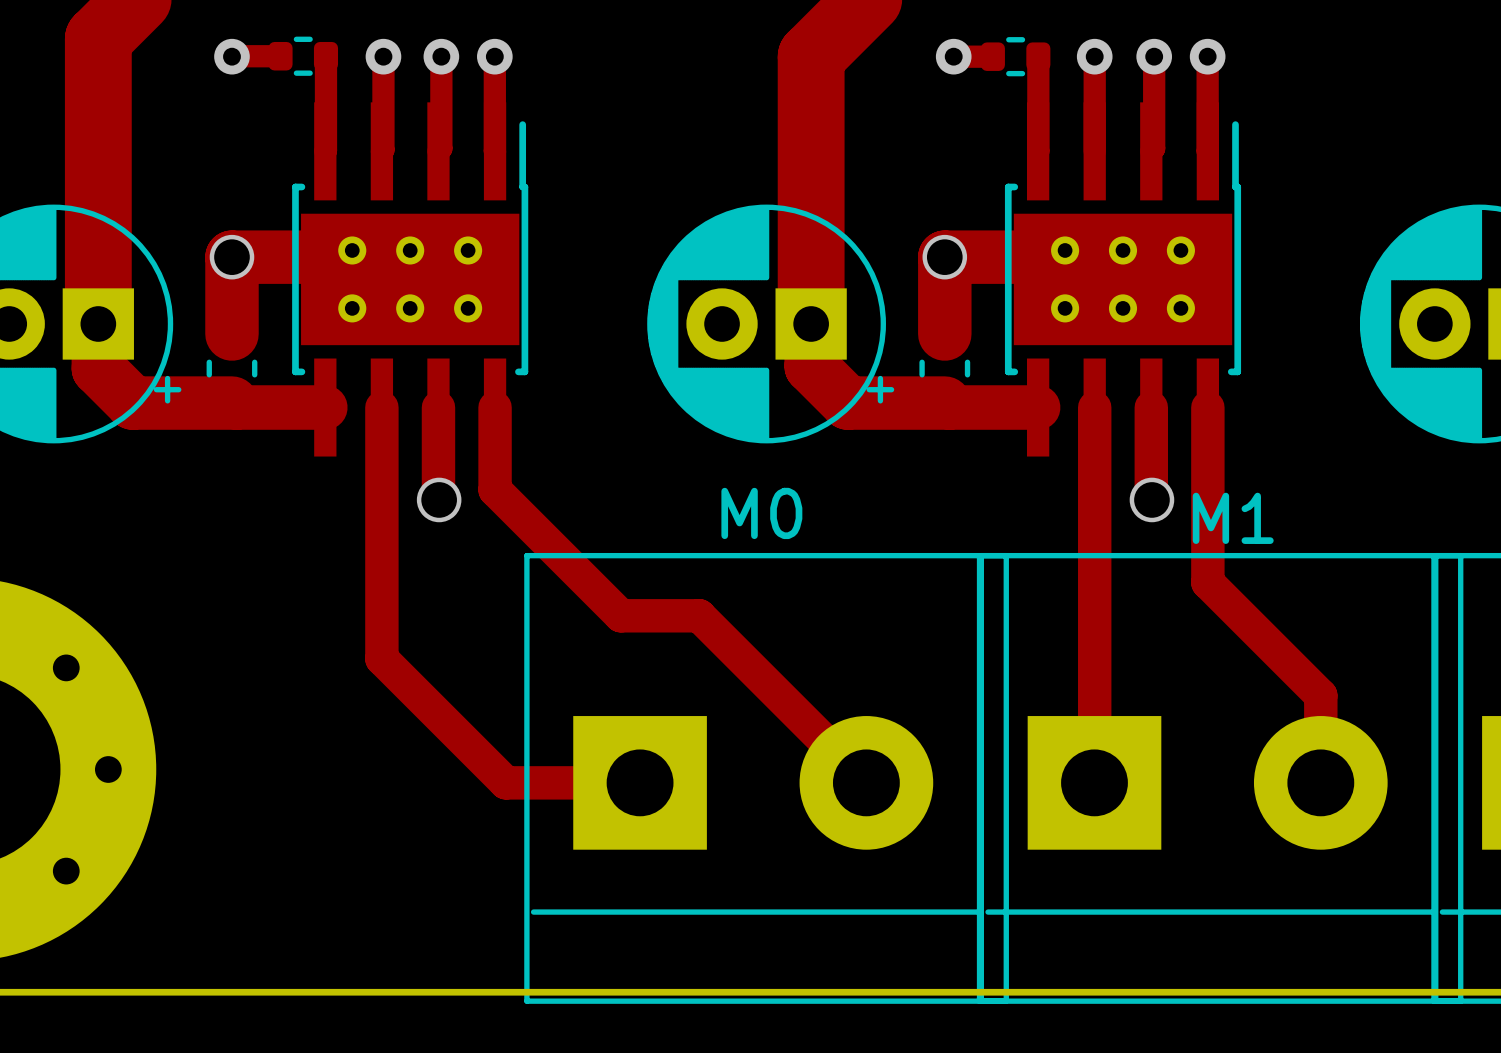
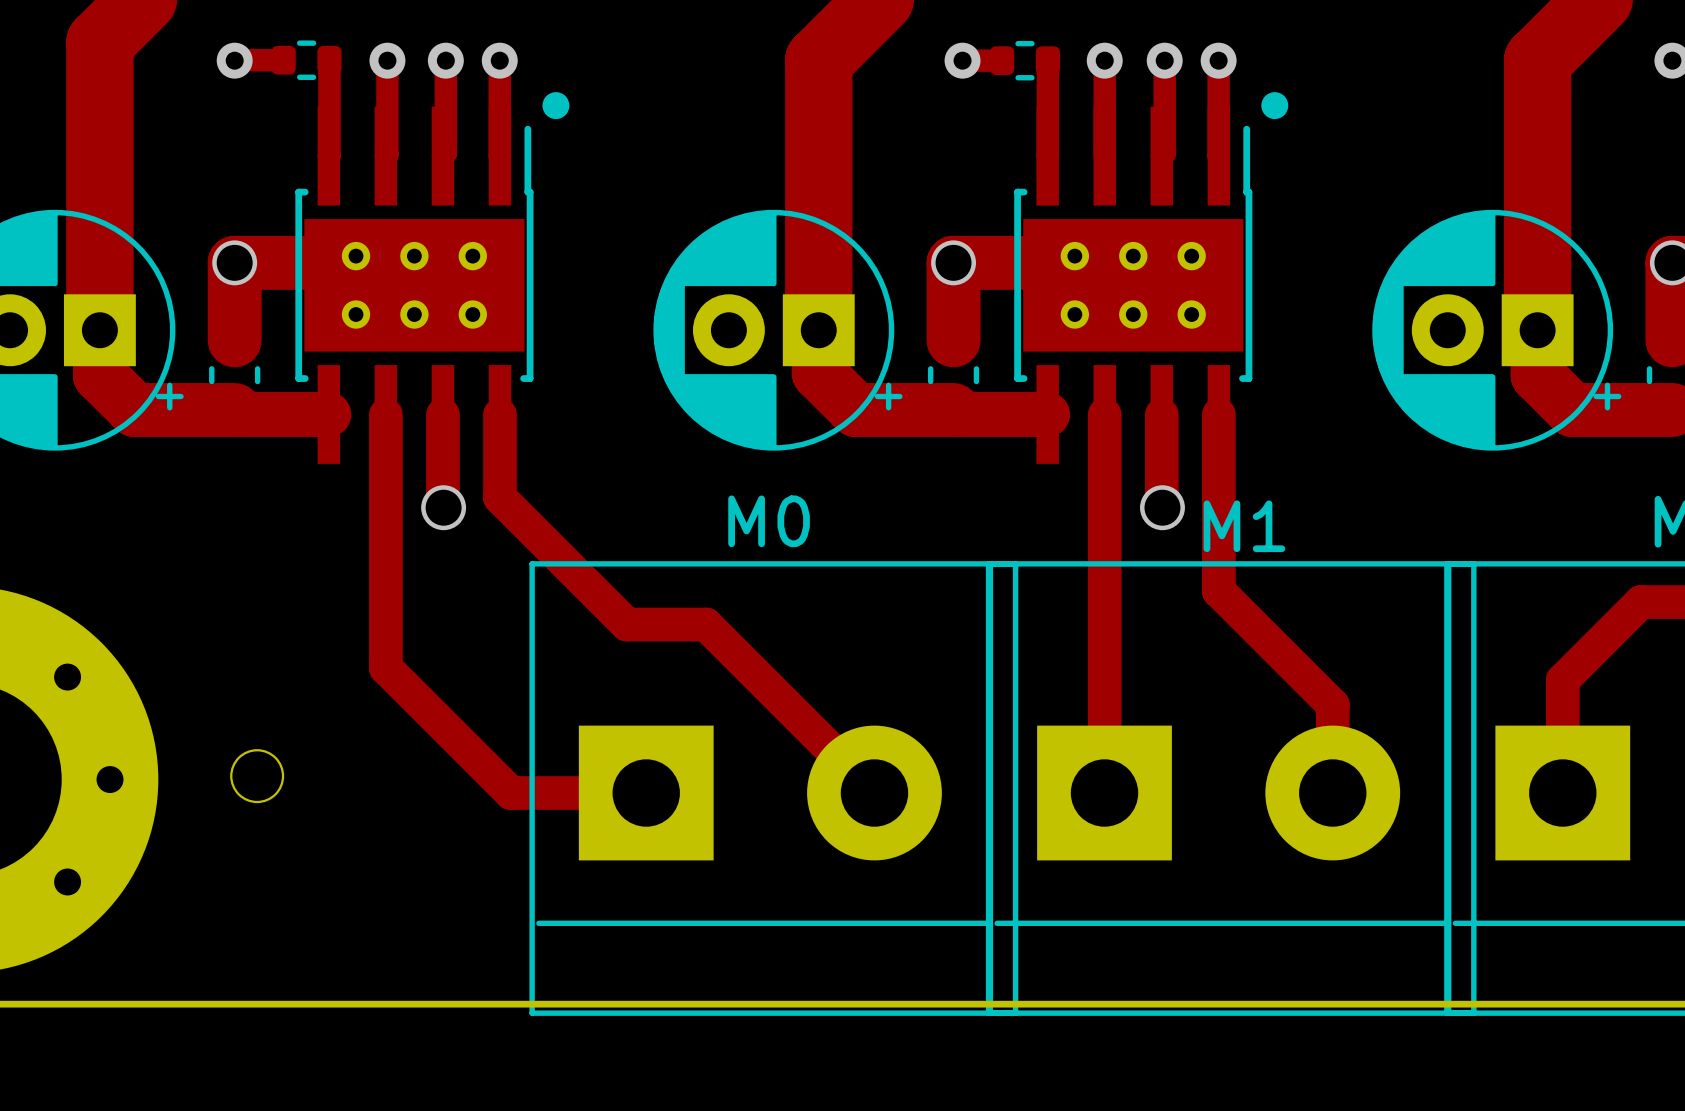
drawing: none -> [542, 92, 570, 120]
drawing: none -> [1261, 92, 1289, 120]
round board edge: none -> [230, 749, 285, 804]

